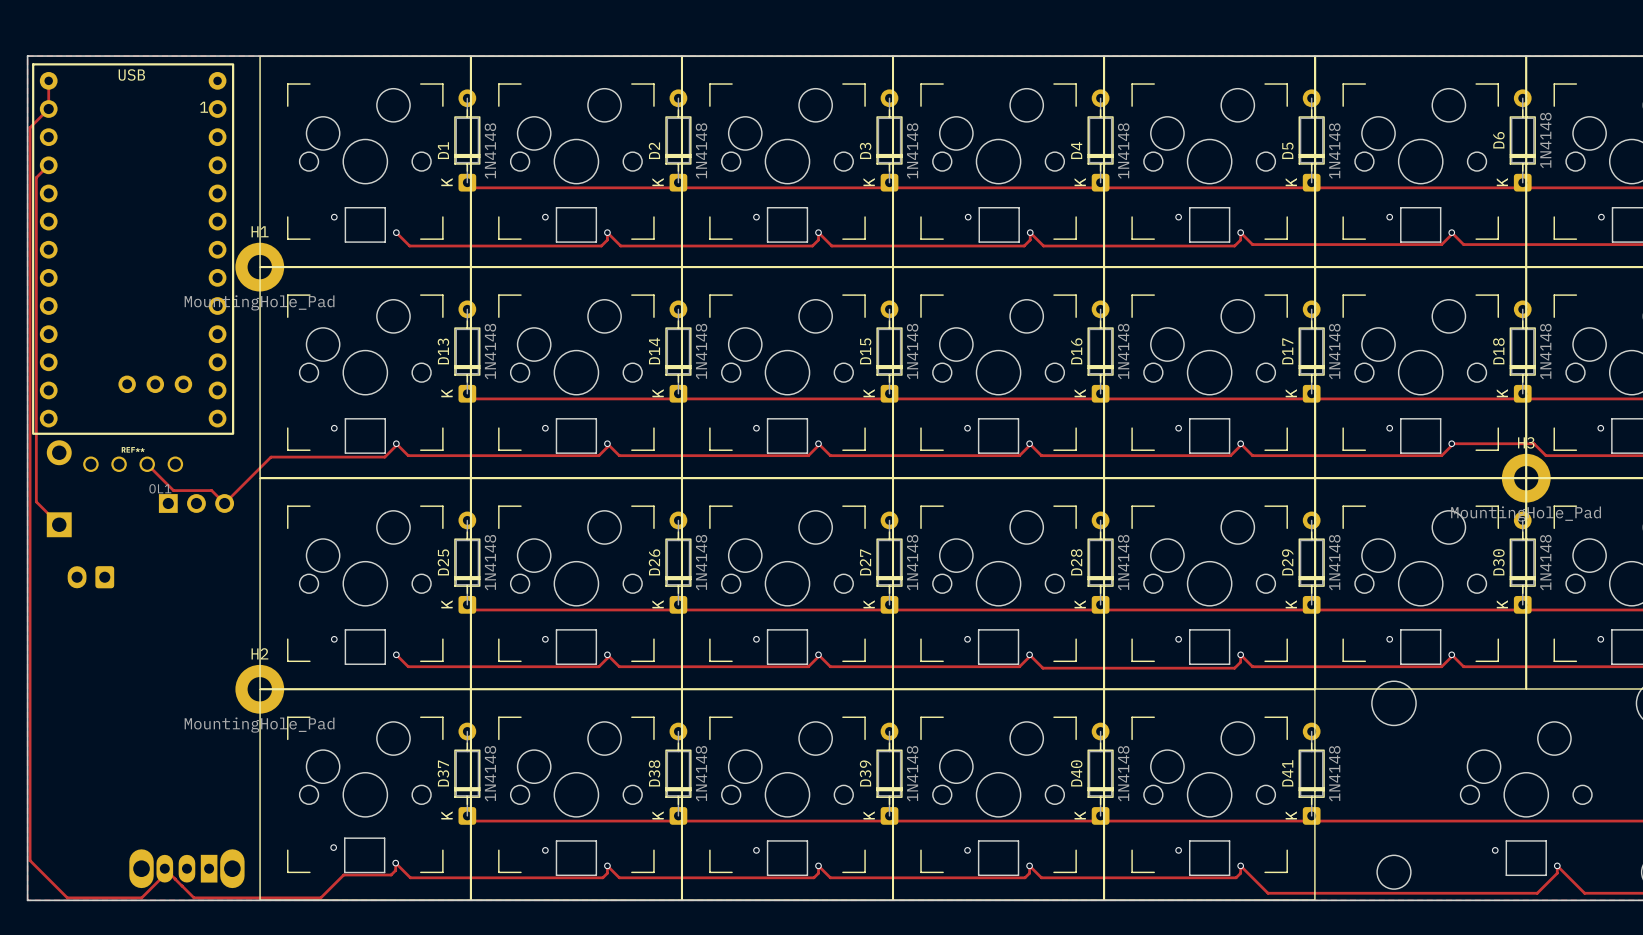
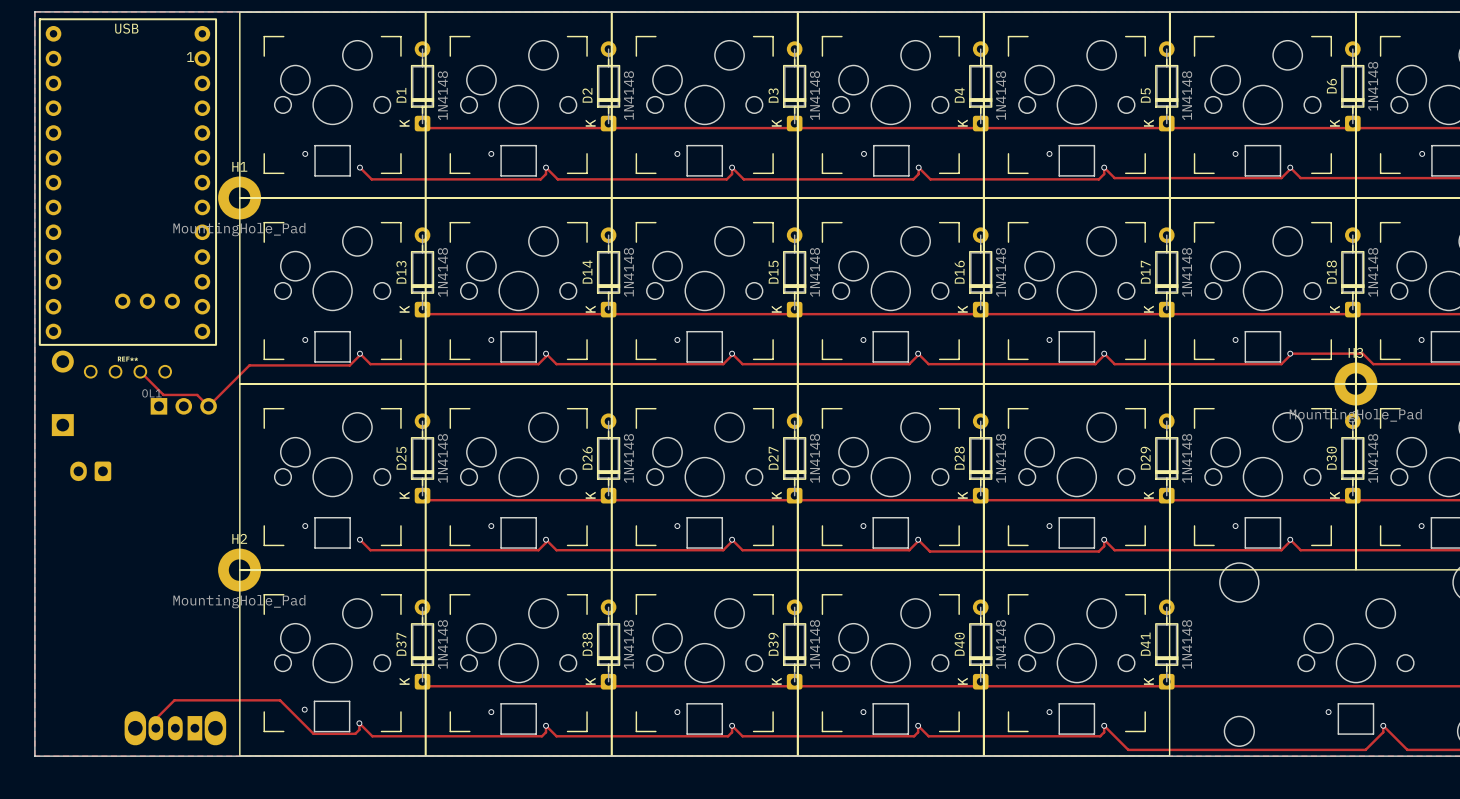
track: (48, 80) (48, 109) (30, 127) (30, 860) (67, 897) (141, 897) (164, 874) -> none
track: (48, 165) (36, 177) (36, 501) (59, 524) -> none
track: (164, 868) (193, 897) (320, 897) (343, 875) -> (155, 718) (174, 700) (280, 700) (313, 733)

